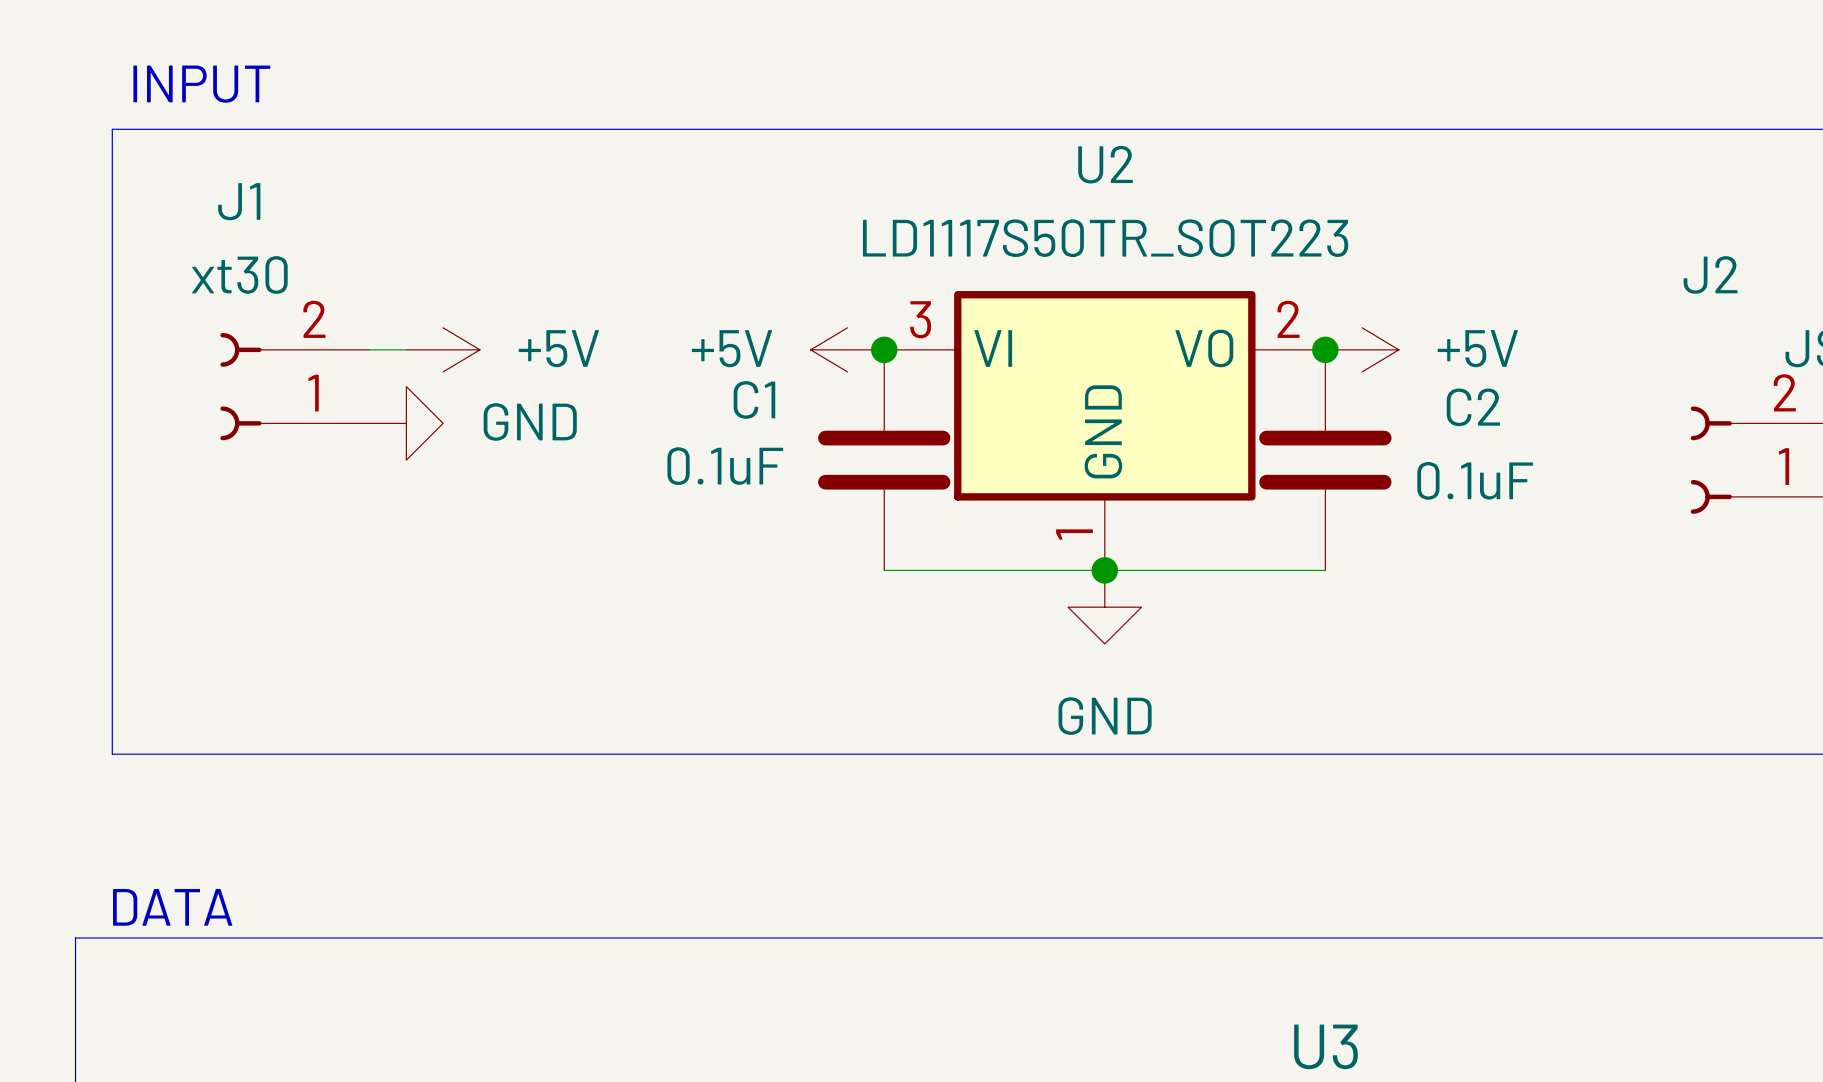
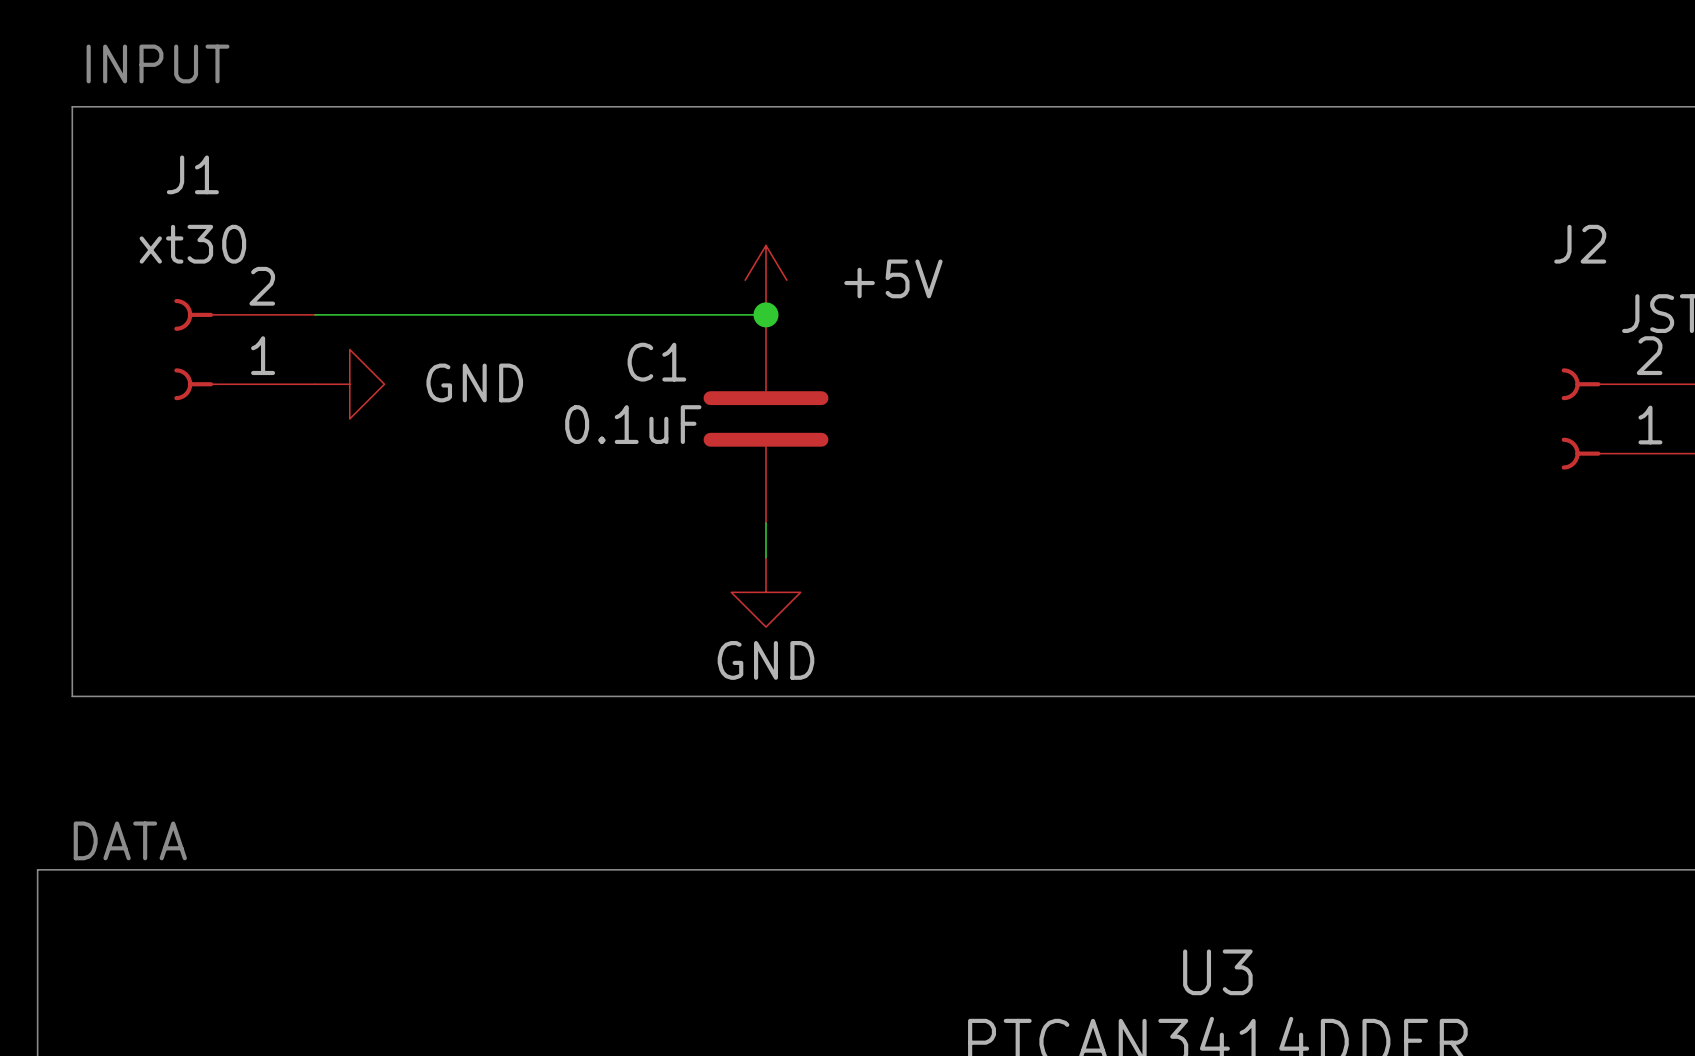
power symbol text position: +5V (732, 348) -> +5V (893, 278)
power symbol: +5V (443, 349) -> none
power symbol rotation: 0° (847, 349) -> 90° clockwise (765, 280)
junction position: (884, 349) -> (765, 314)
junction: (1325, 349) -> none
power symbol: +5V (1362, 349) -> none
U2: LD1117S50TR_SOT223 (1104, 430) -> none
C1 position: (884, 460) -> (765, 418)
C2: 0.1uF (1325, 460) -> none
wire: none -> (765, 522) (765, 557)
wire: (884, 570) (1325, 570) -> (349, 314) (765, 314)
junction: (1104, 570) -> none
power symbol position: GND (1104, 607) -> GND (765, 592)
power symbol text position: GND (1105, 716) -> GND (765, 660)

